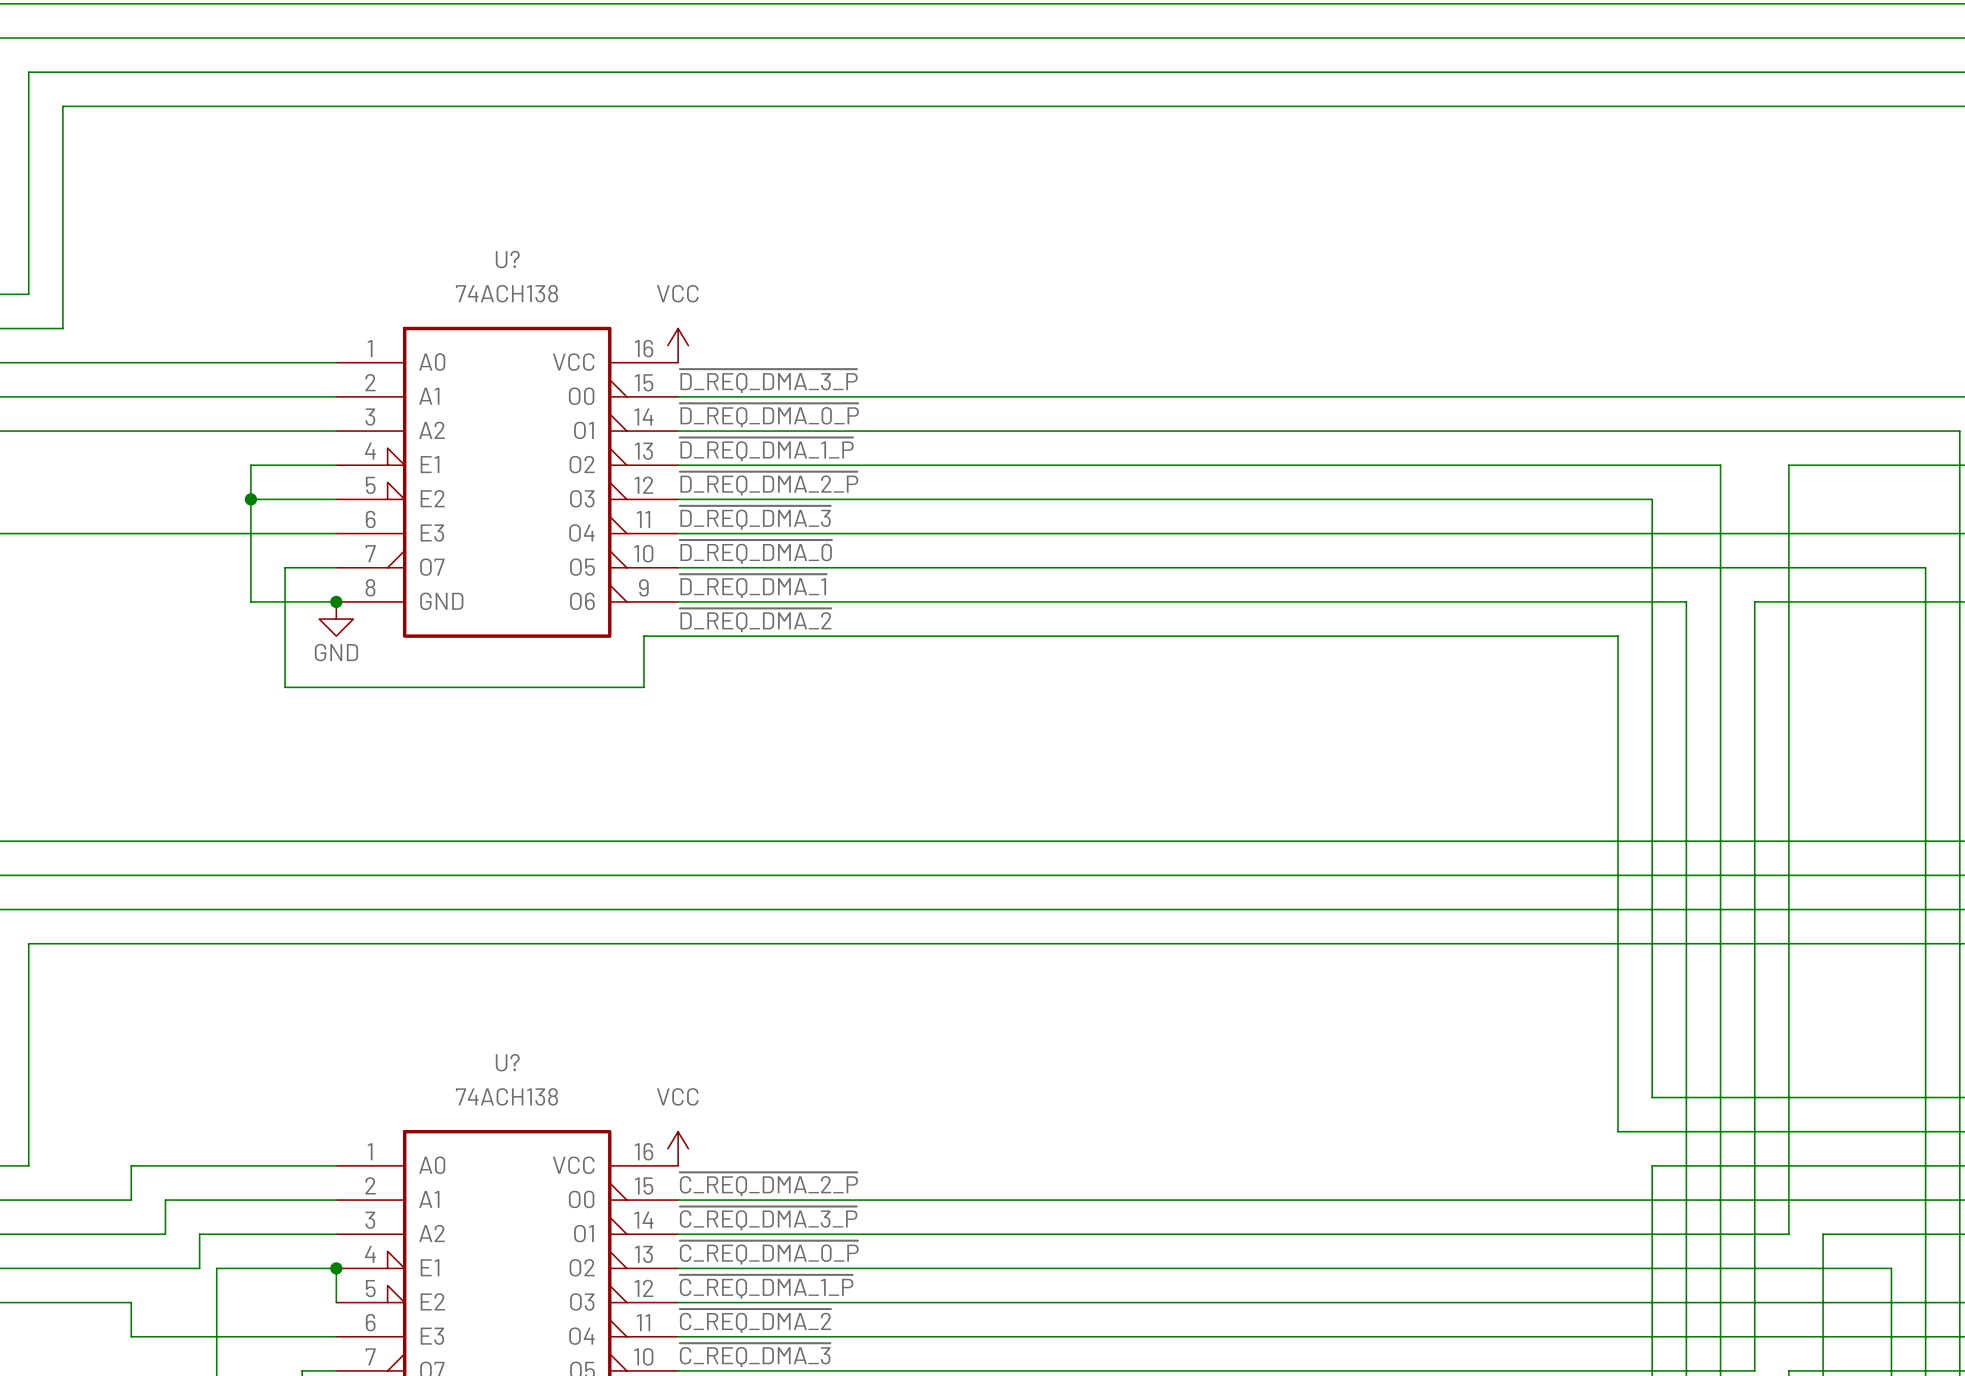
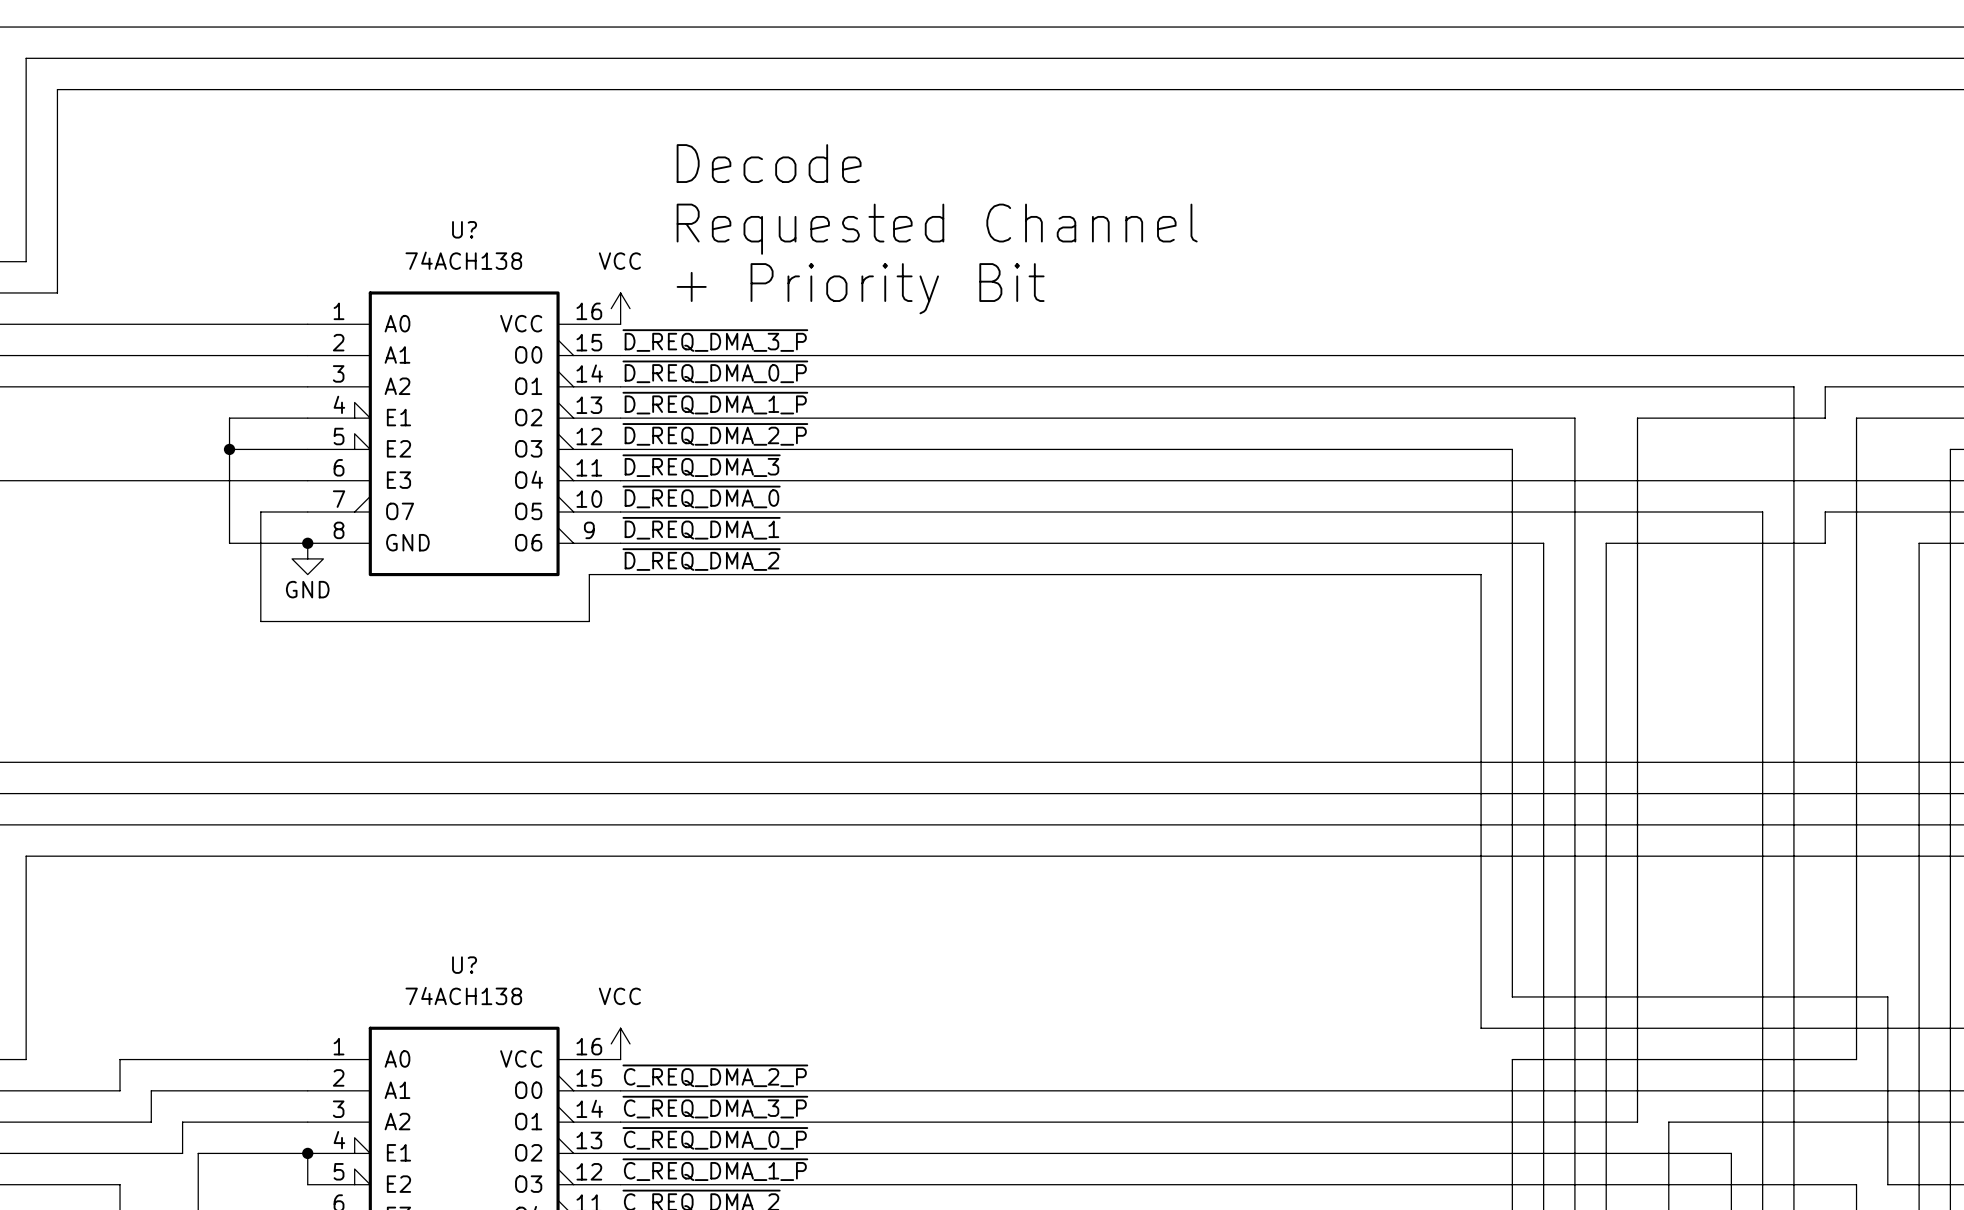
text: none -> Decode (769, 163)
text: none -> Requested Channel (937, 229)
text: none -> + Priority Bit (860, 288)

